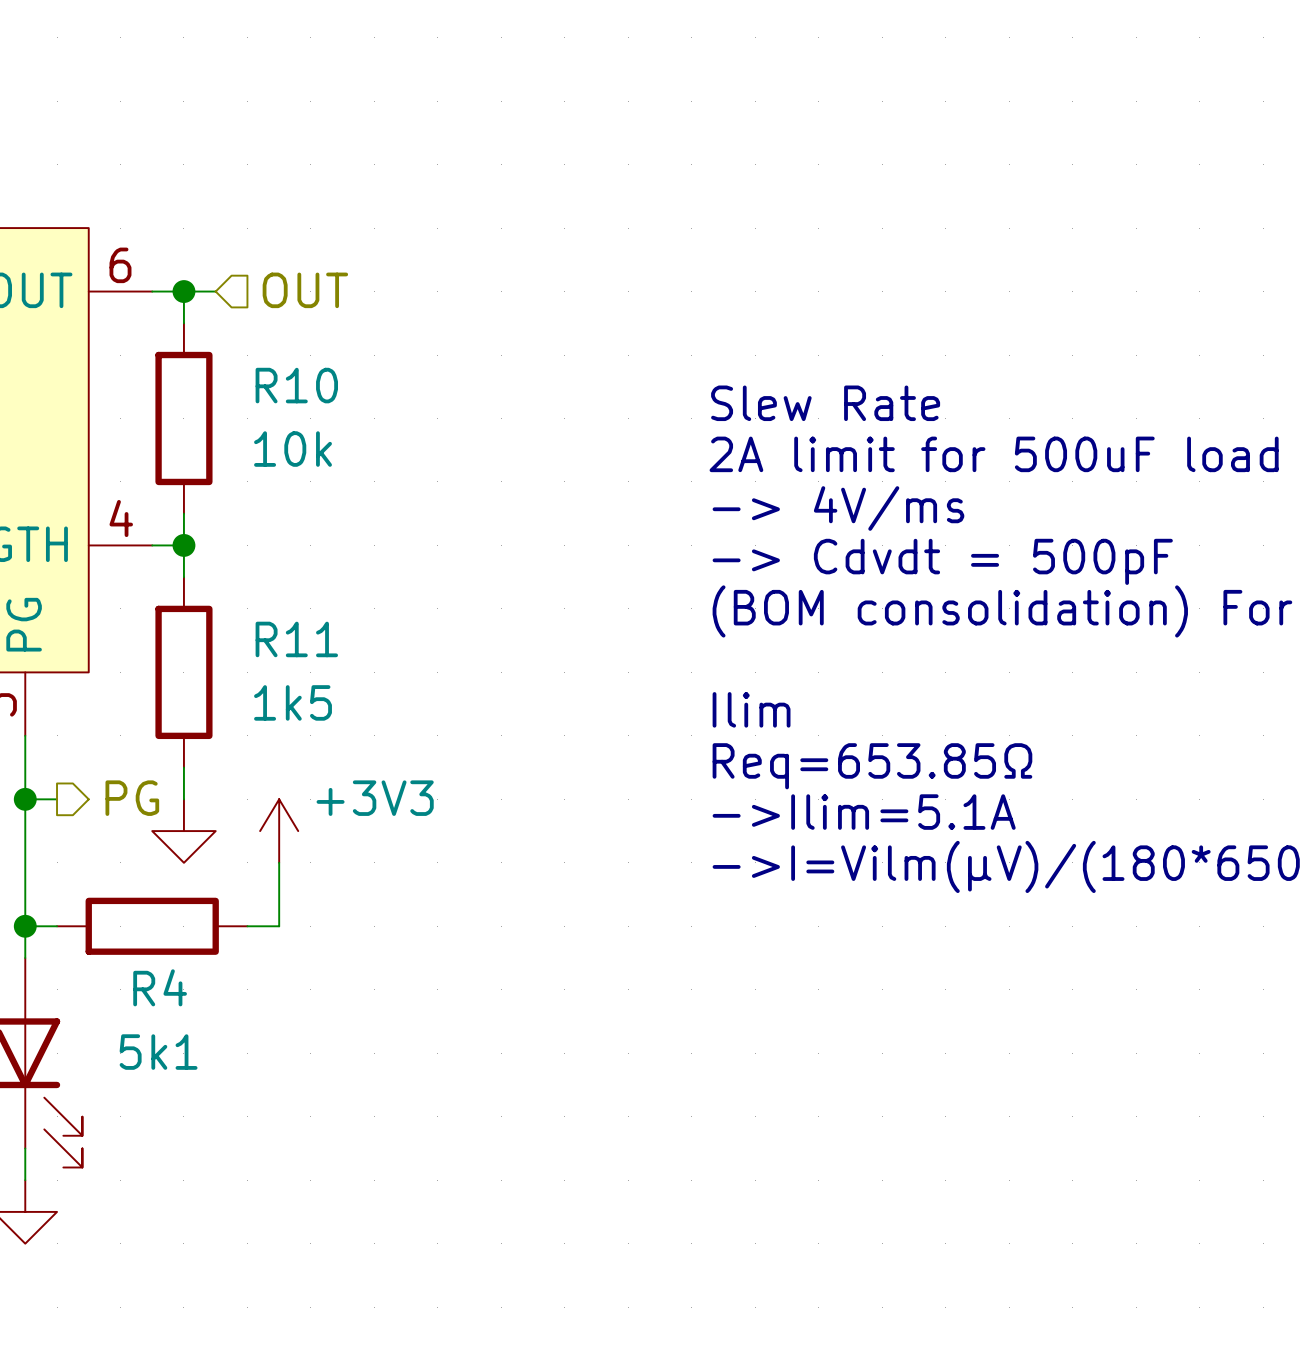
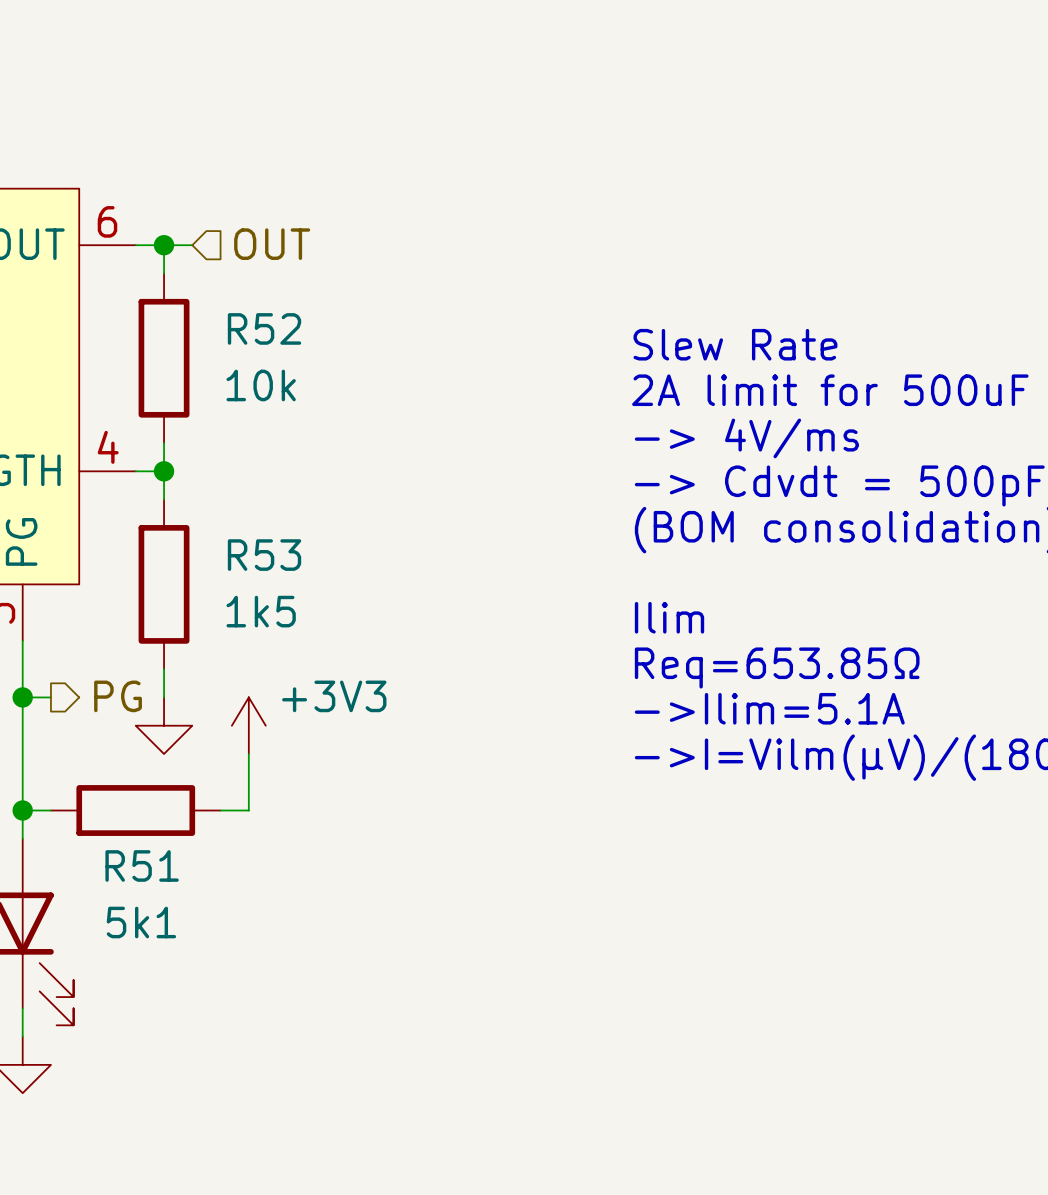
R10 name: R10 (296, 385) -> R52 (264, 328)
R11 name: R11 (296, 639) -> R53 (264, 555)
R4 name: R4 (160, 987) -> R51 (142, 865)

